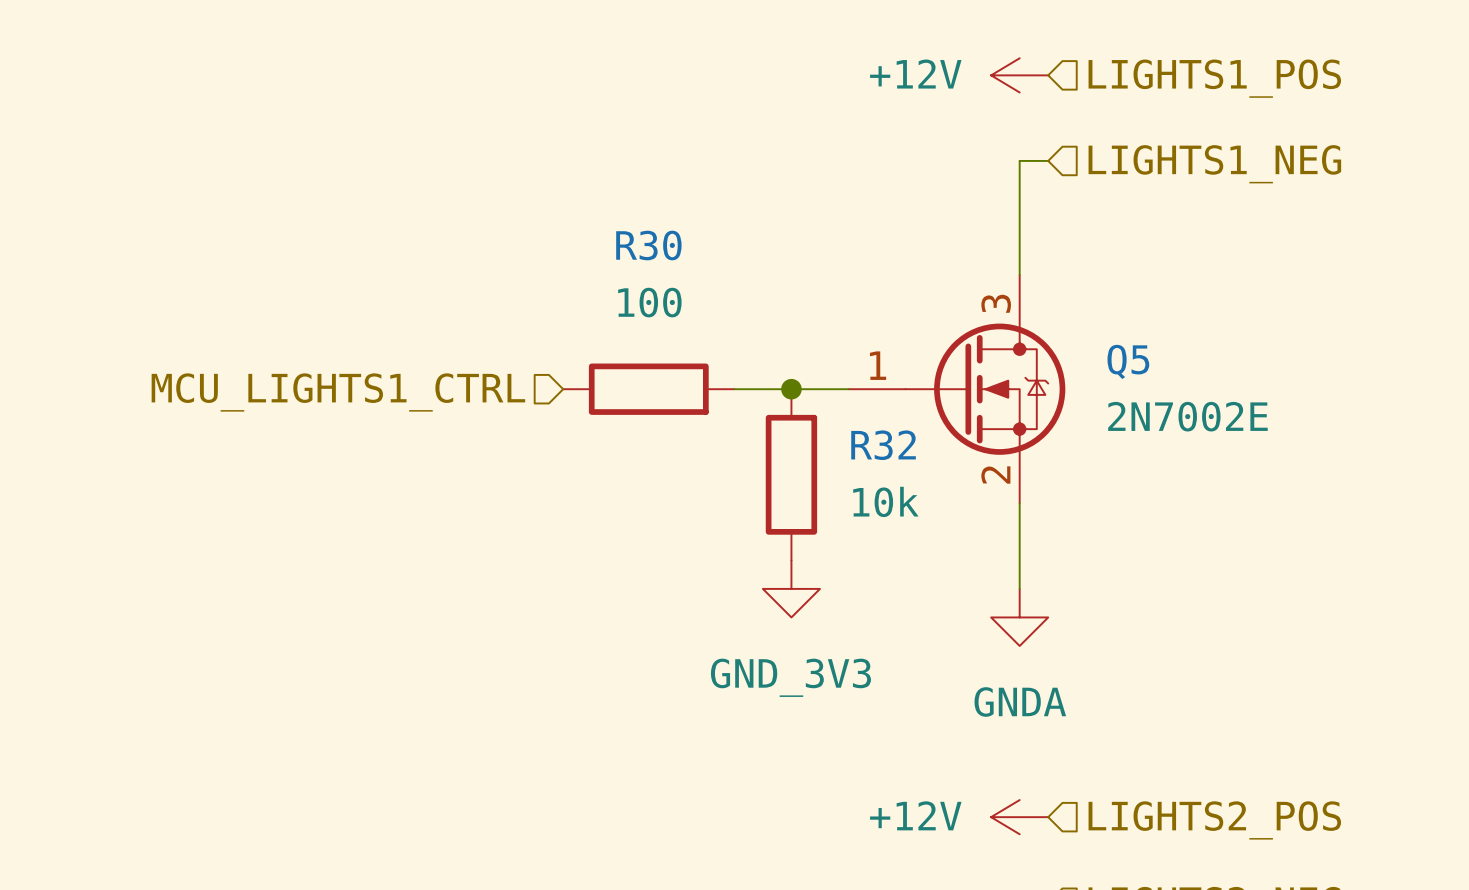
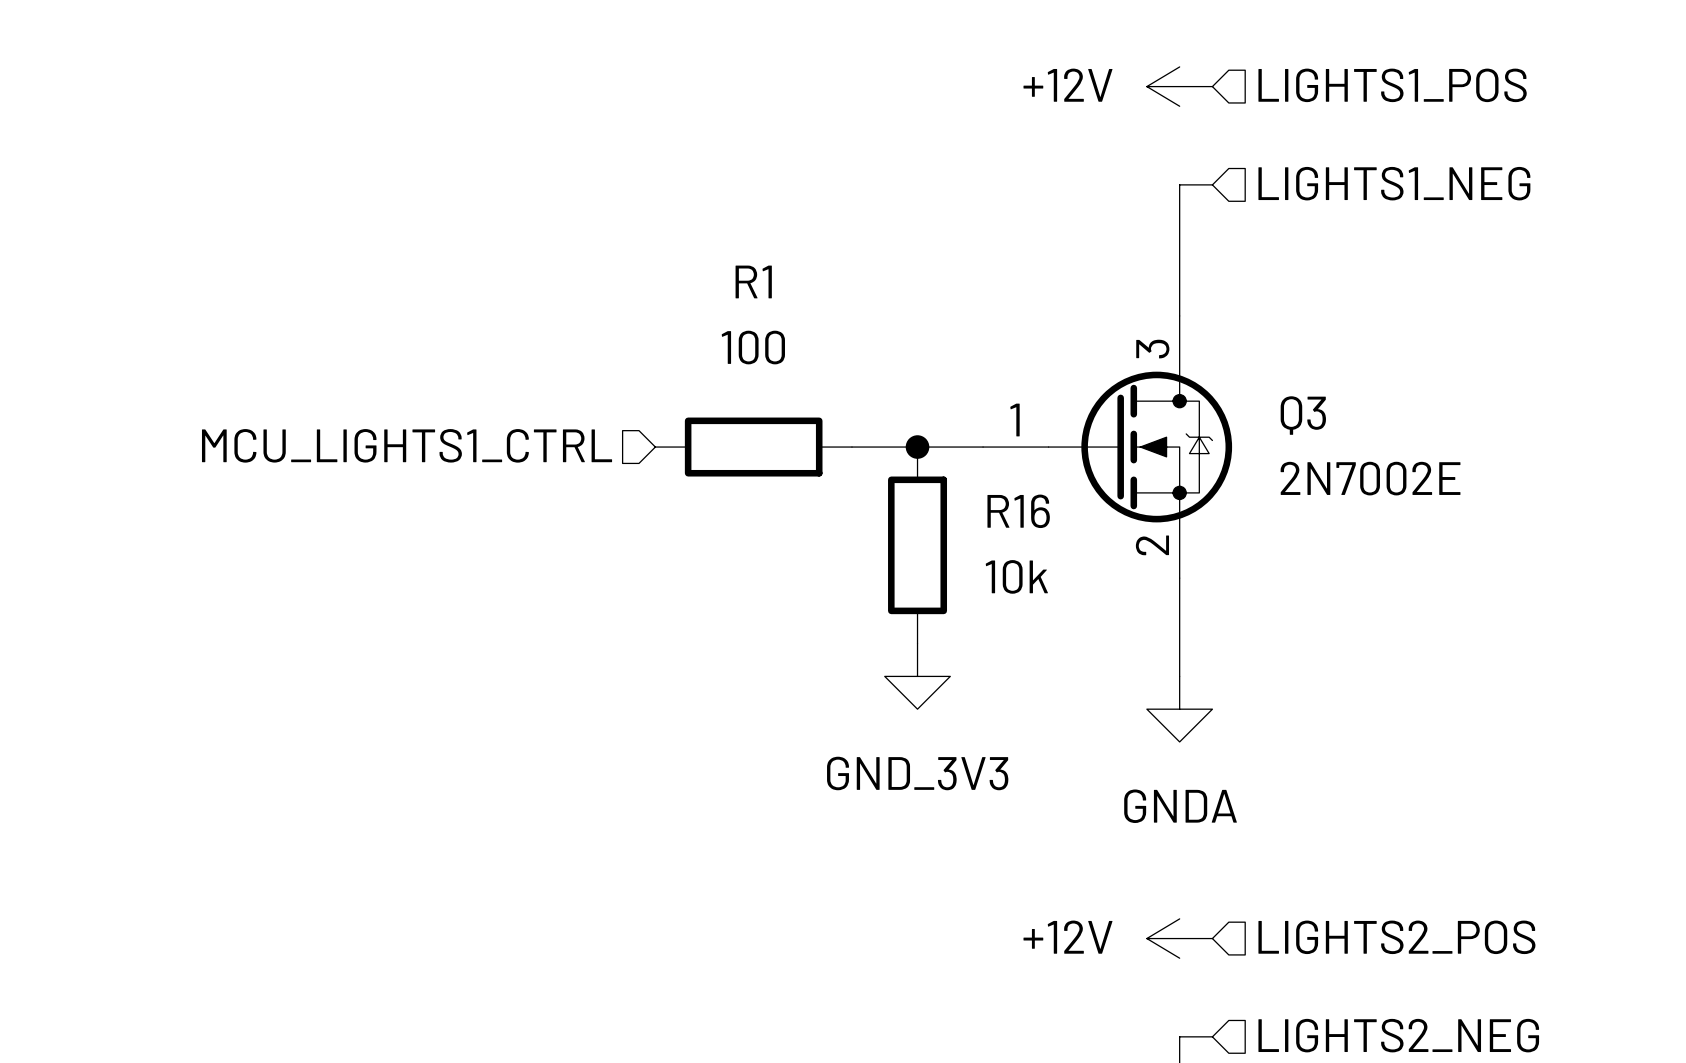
R30 name: R30 (648, 245) -> R1 (753, 281)
Q5 name: Q5 (1128, 361) -> Q3 (1303, 415)
R32 name: R32 (883, 445) -> R16 (1018, 511)

